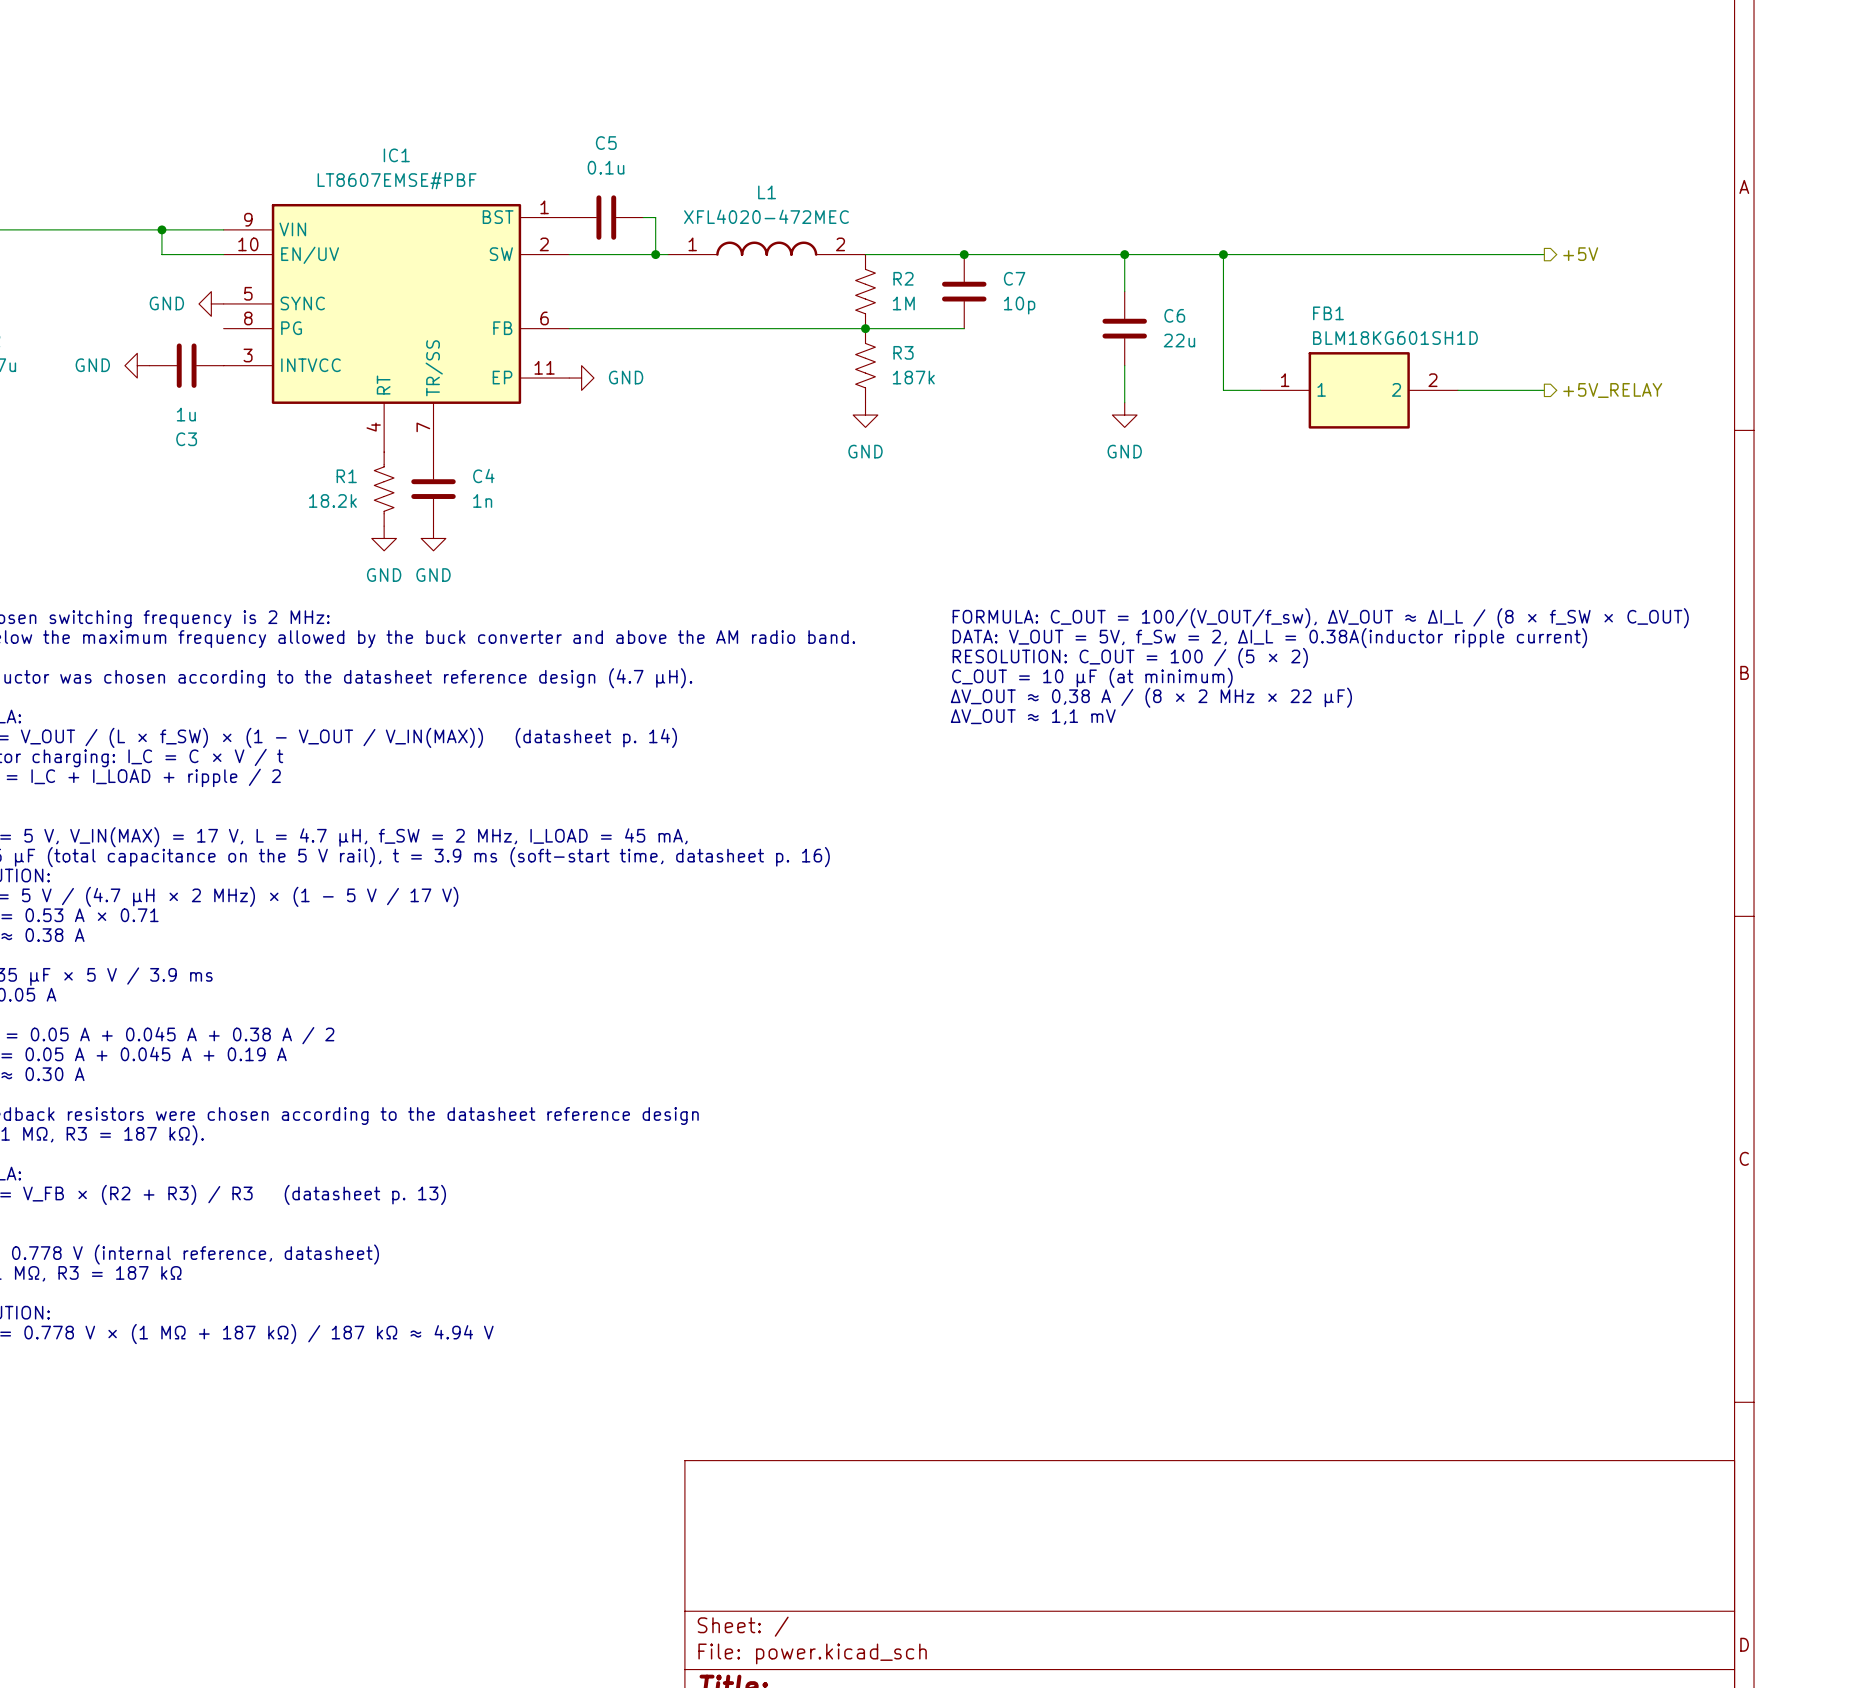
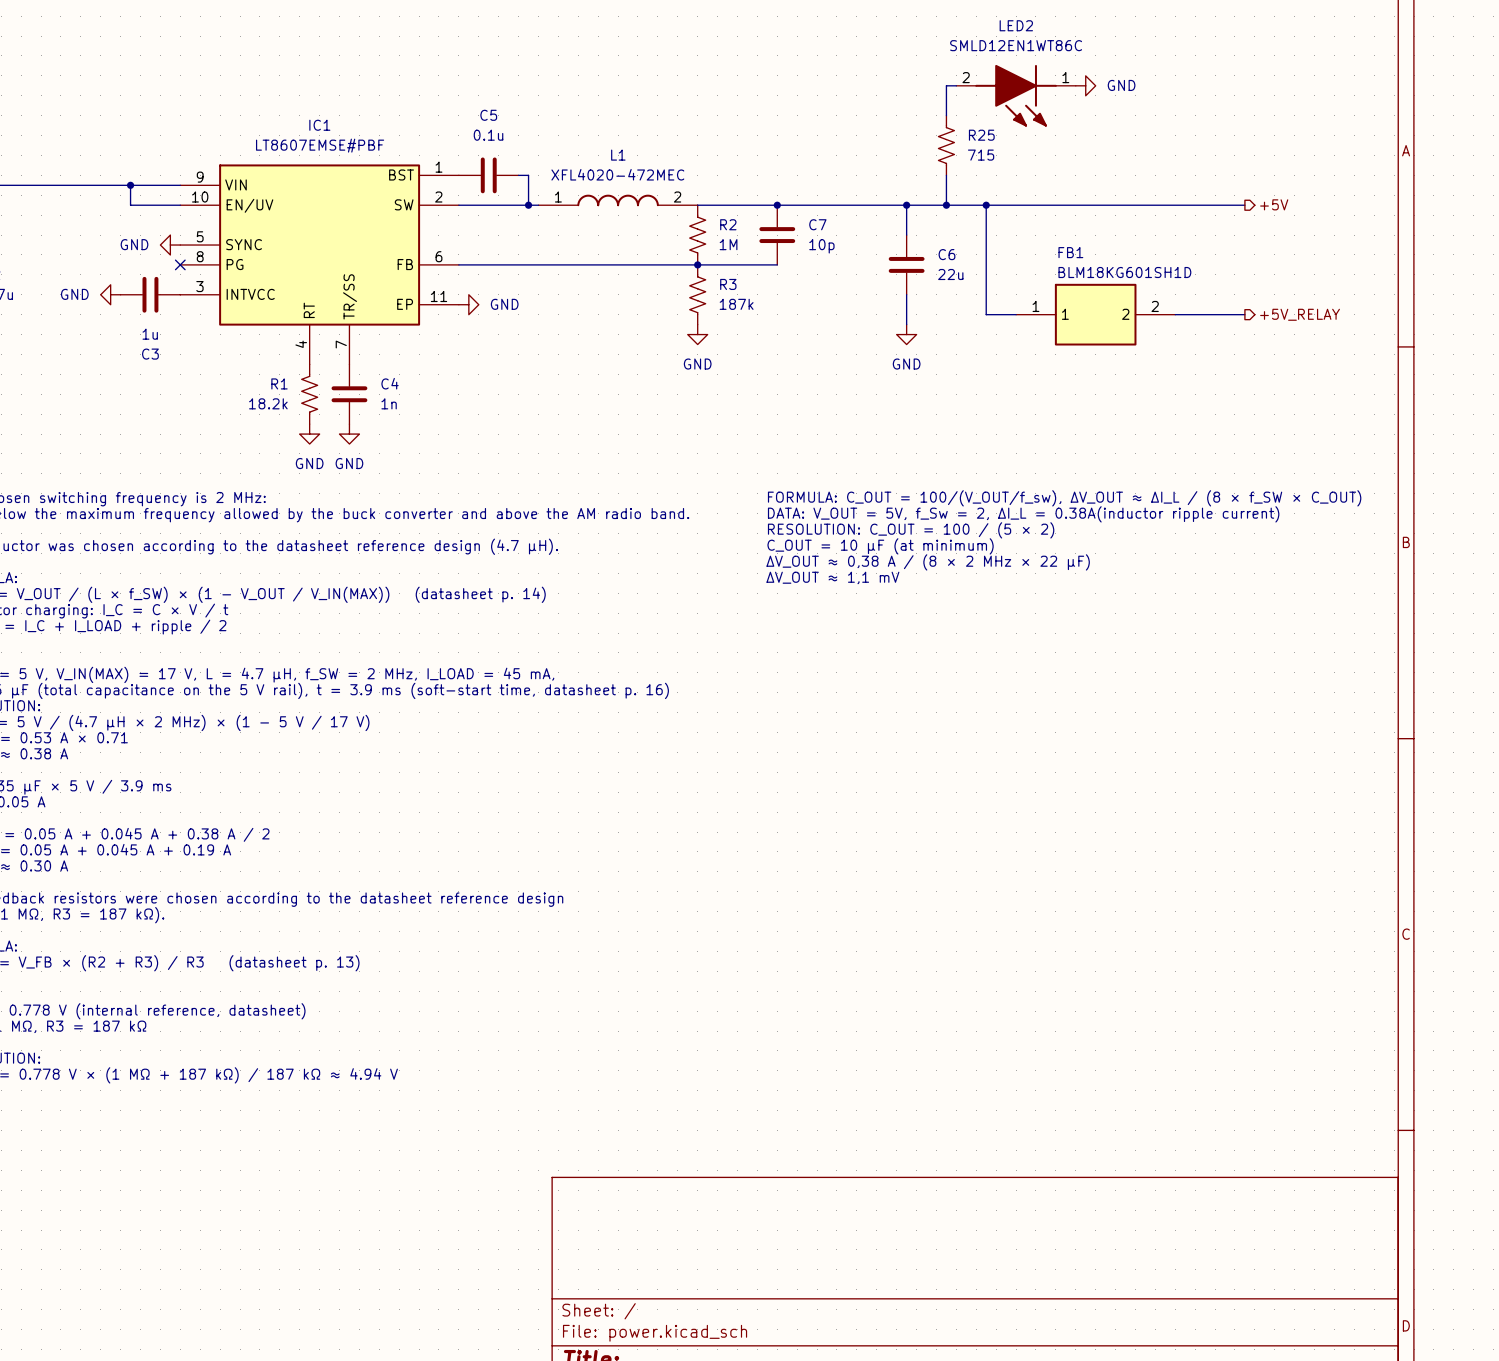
wire: none -> (956, 85) (946, 85) (946, 115)
power symbol: none -> GND (1085, 85)
LED2: none -> SMLD12EN1WT86C (1016, 95)
R25: none -> 715 (946, 145)
wire: none -> (946, 175) (946, 205)
junction: none -> (946, 205)
no-connect mark: none -> (180, 264)

